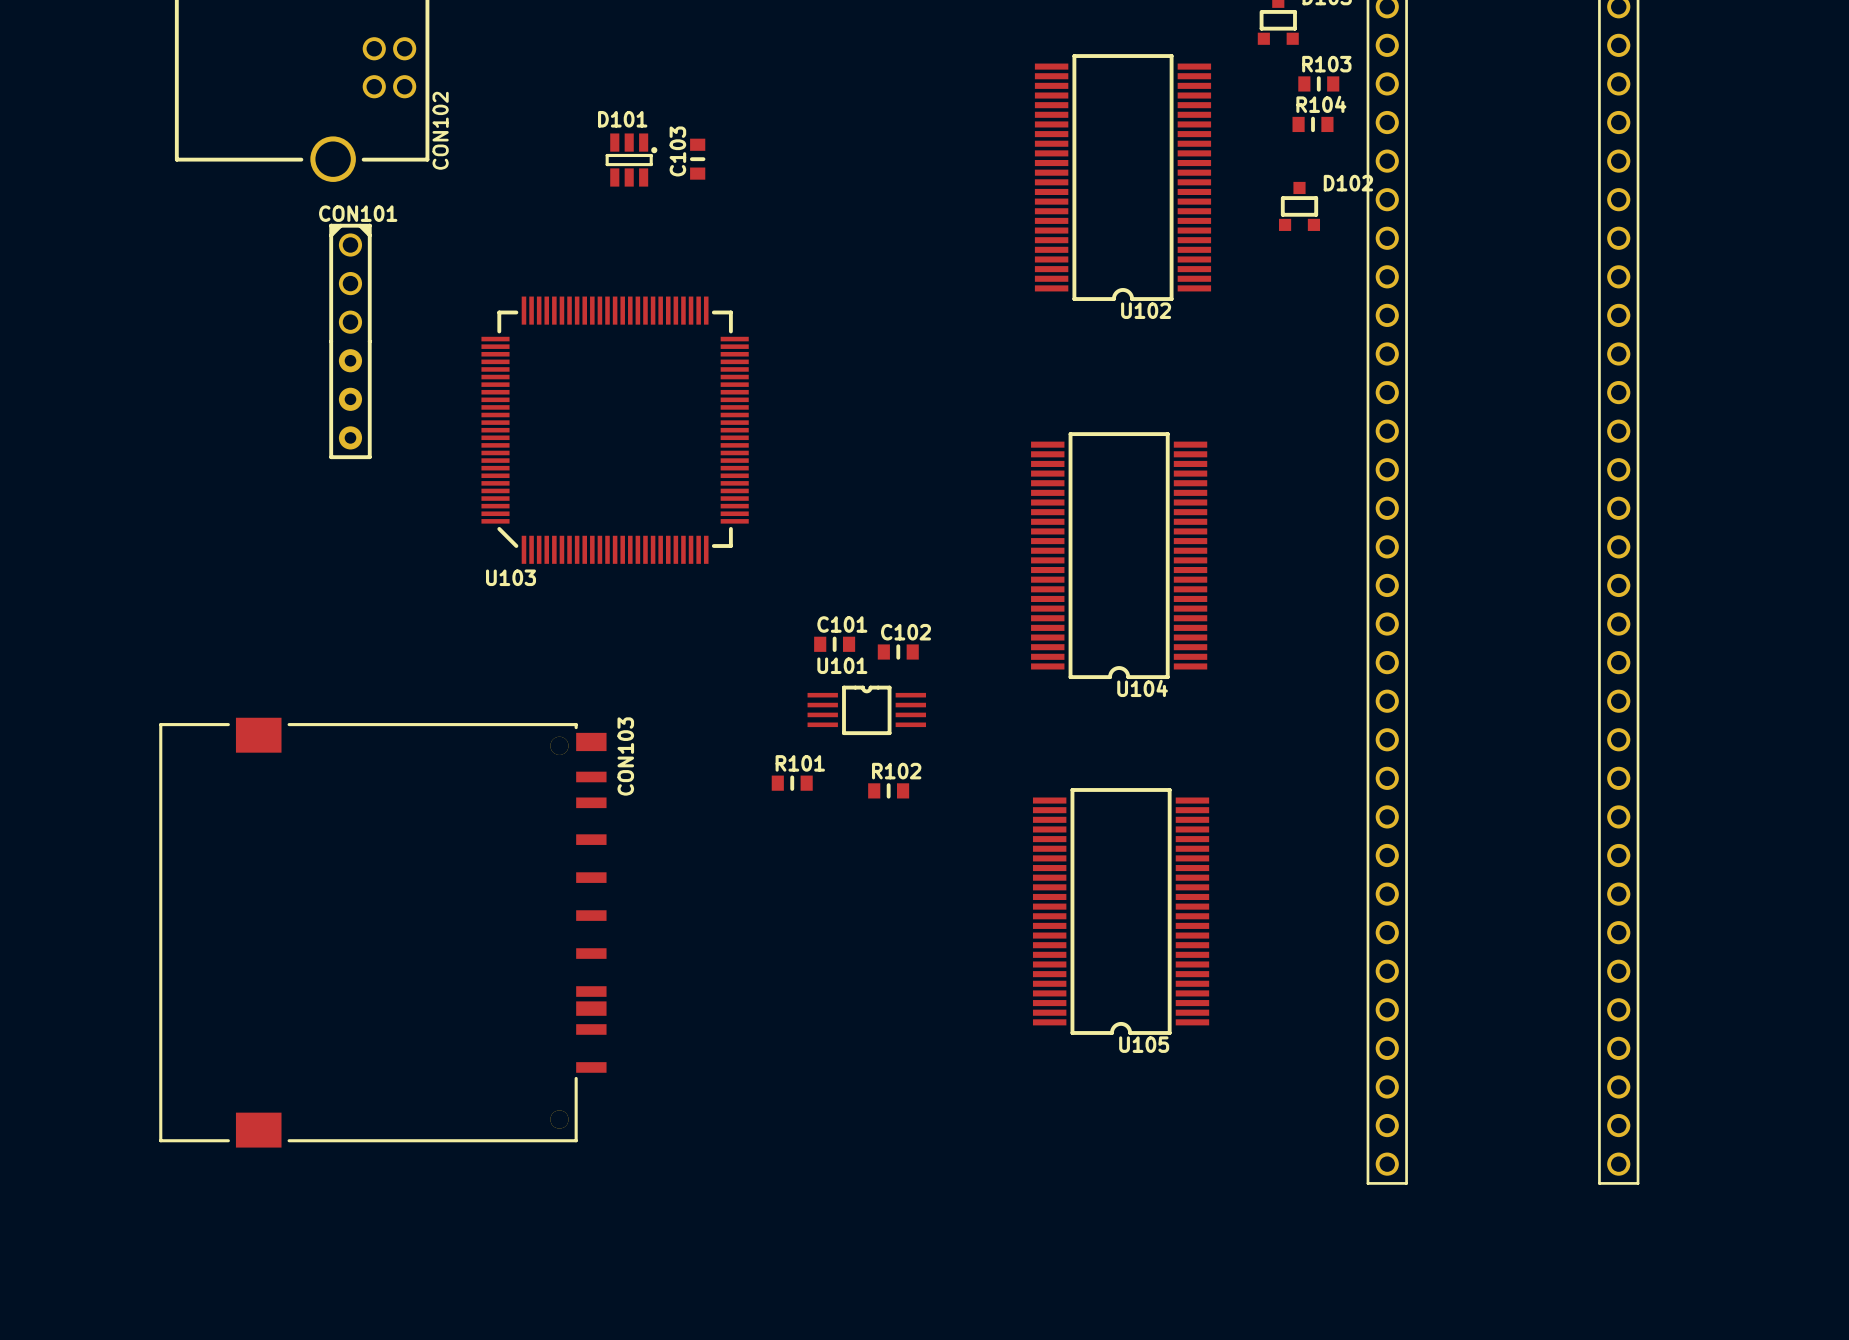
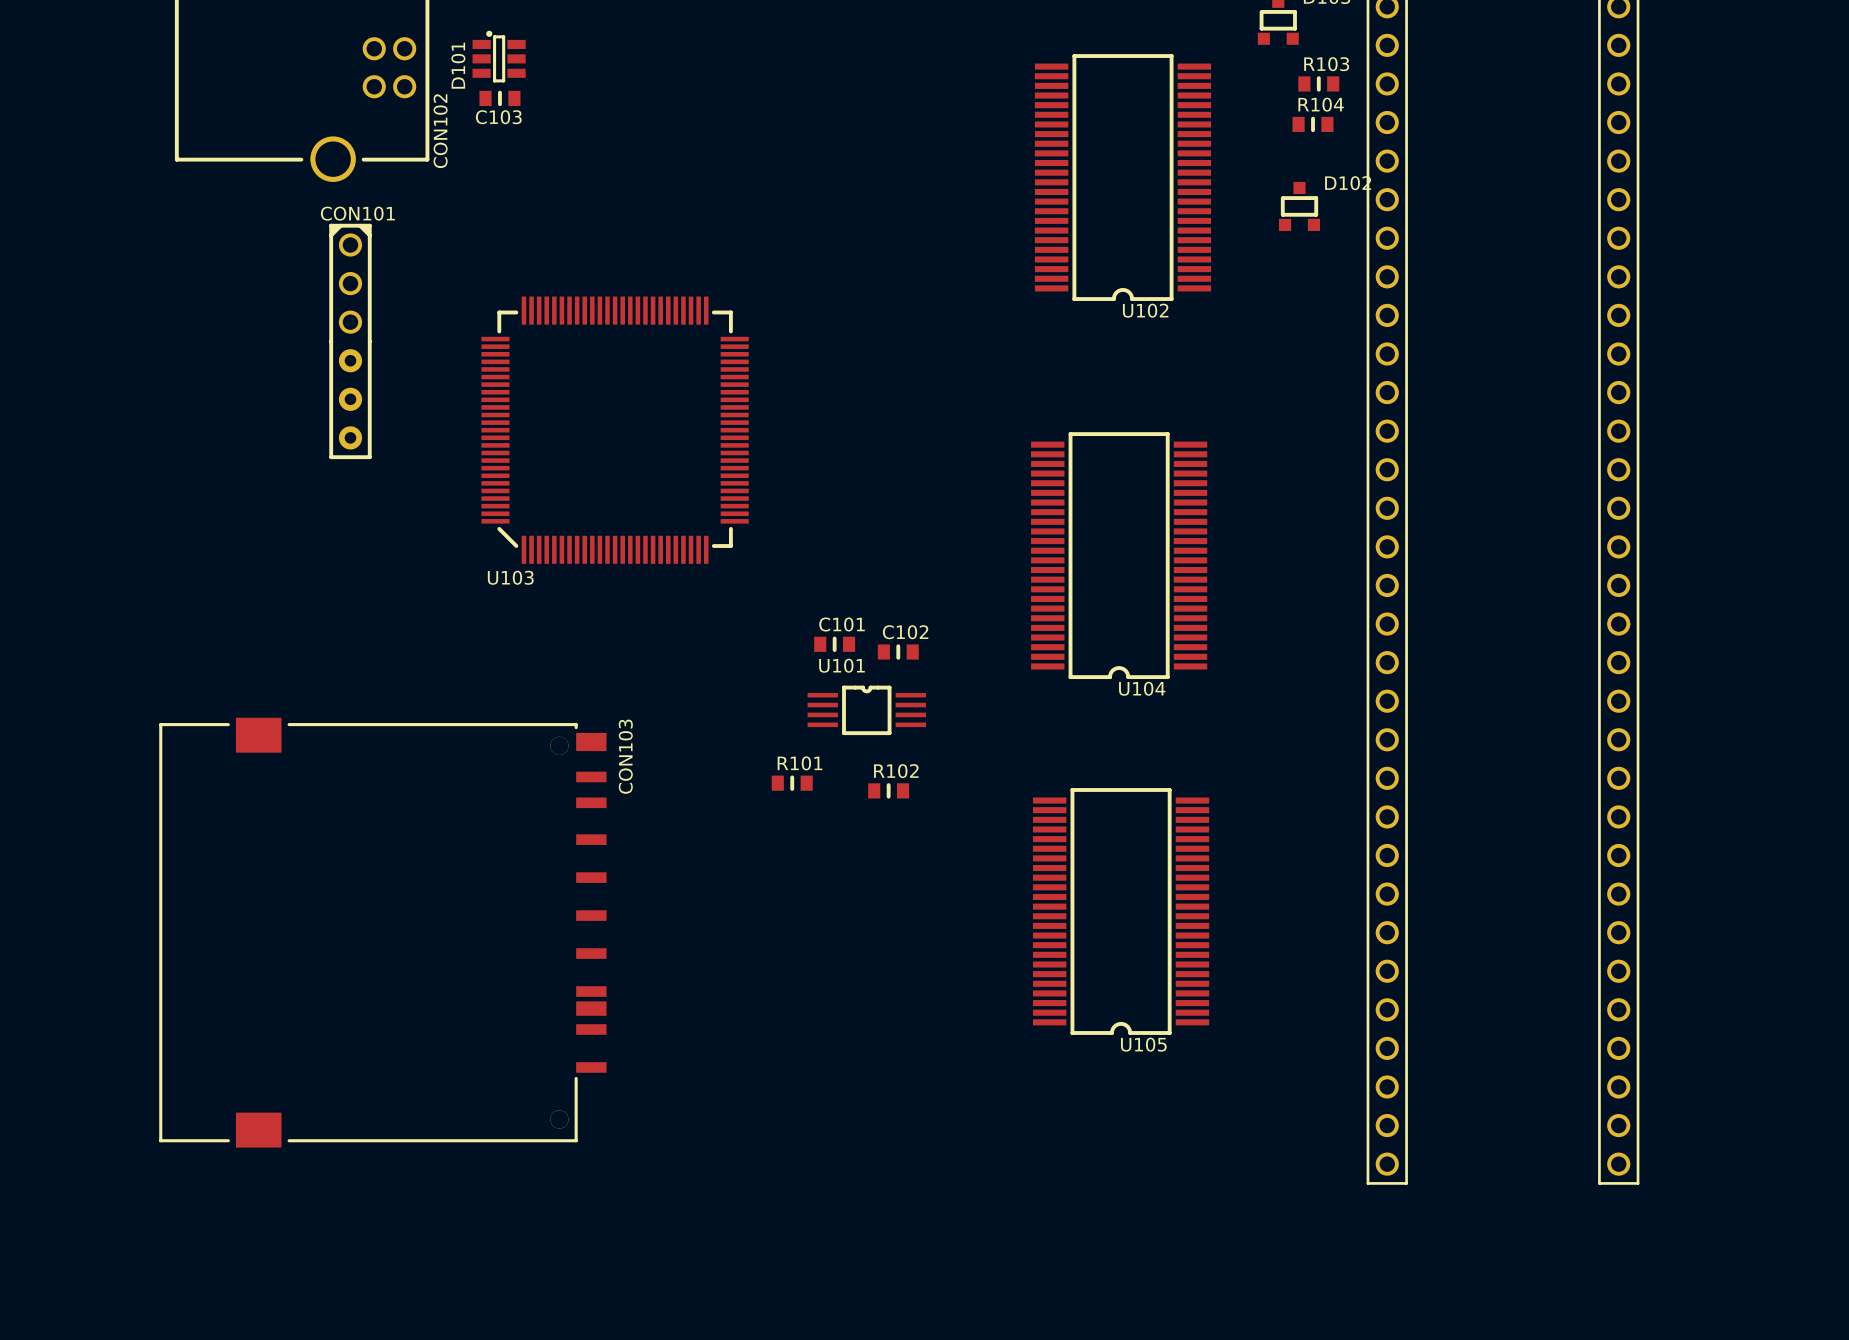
C103 name position: C103 (677, 151) -> C103 (498, 117)
C103 rotation: 0° (697, 159) -> 90° clockwise (499, 98)
C103 position: (697, 159) -> (499, 98)
D101 rotation: 0° (631, 160) -> 90° counterclockwise (499, 56)
D101 position: (631, 160) -> (499, 56)

